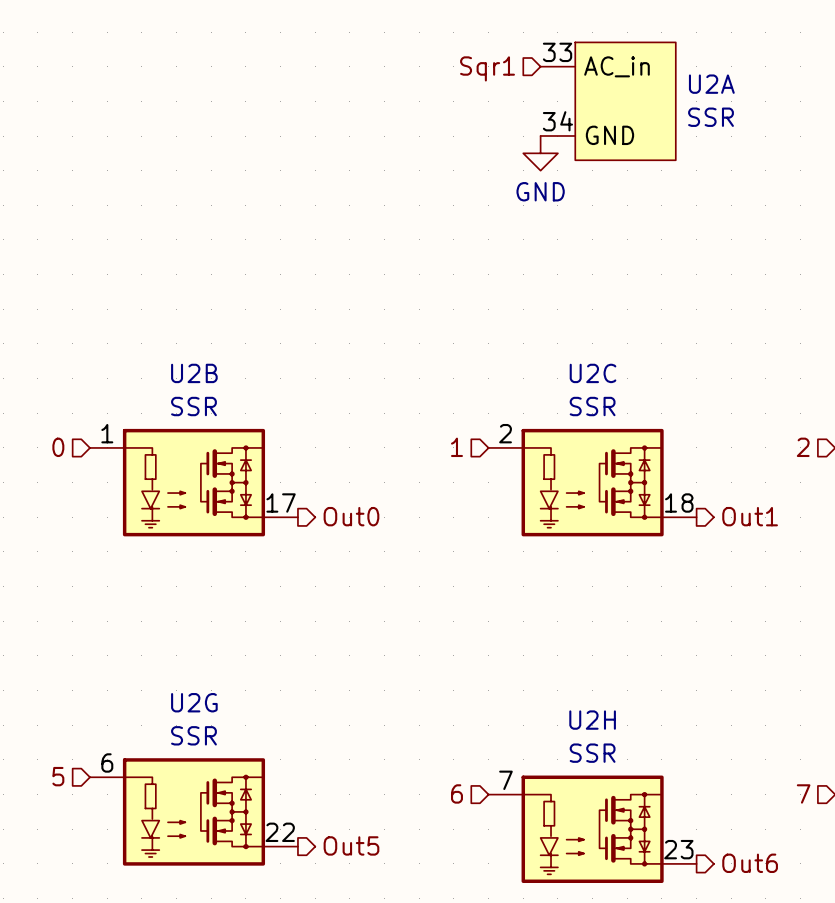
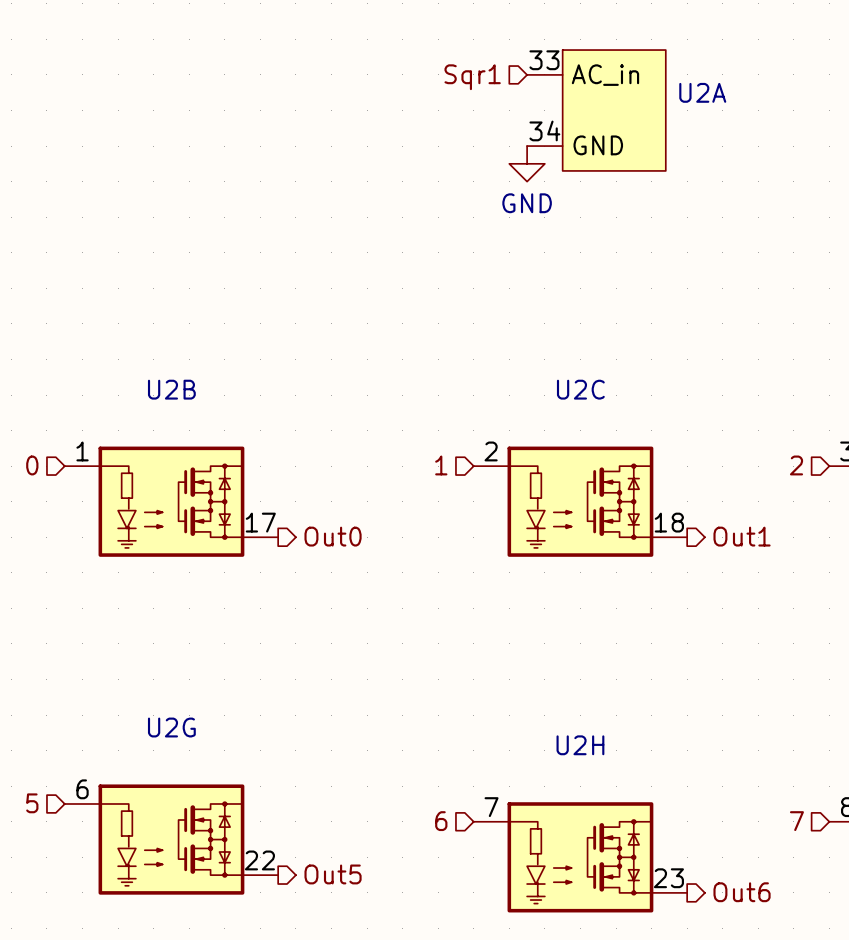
U2A value: SSR (711, 117) -> none
U2B value: SSR (193, 406) -> none
U2C value: SSR (592, 406) -> none
U2G value: SSR (193, 735) -> none
U2H value: SSR (592, 753) -> none

